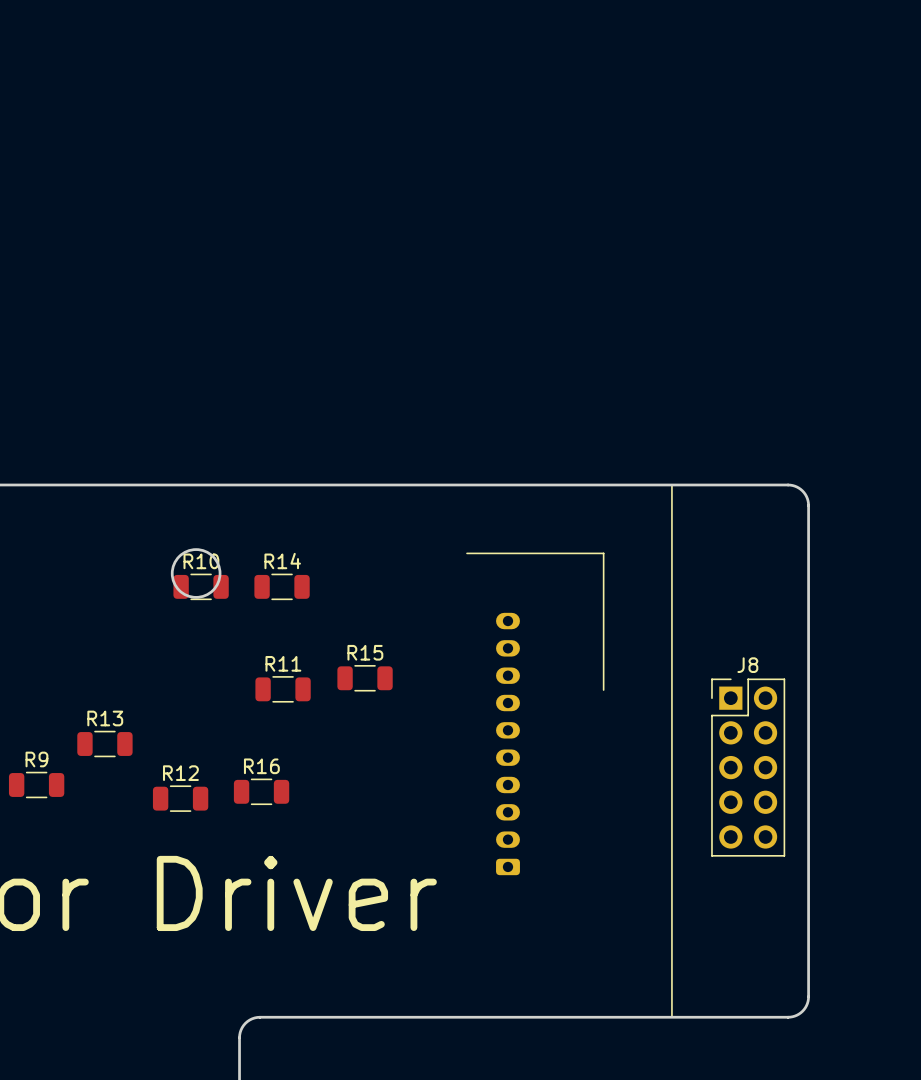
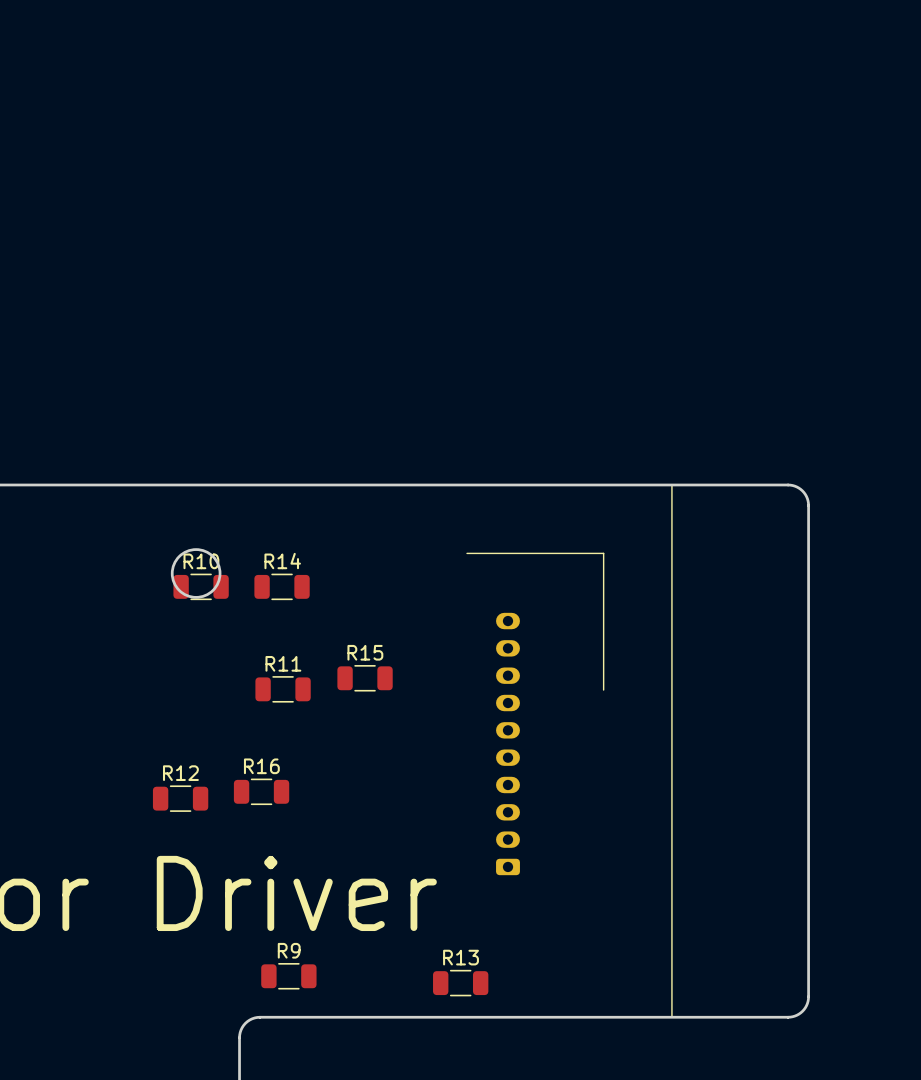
R13 position: (104, 744) -> (460, 983)
J8: (748, 767) -> none
R9 position: (36, 784) -> (288, 976)

